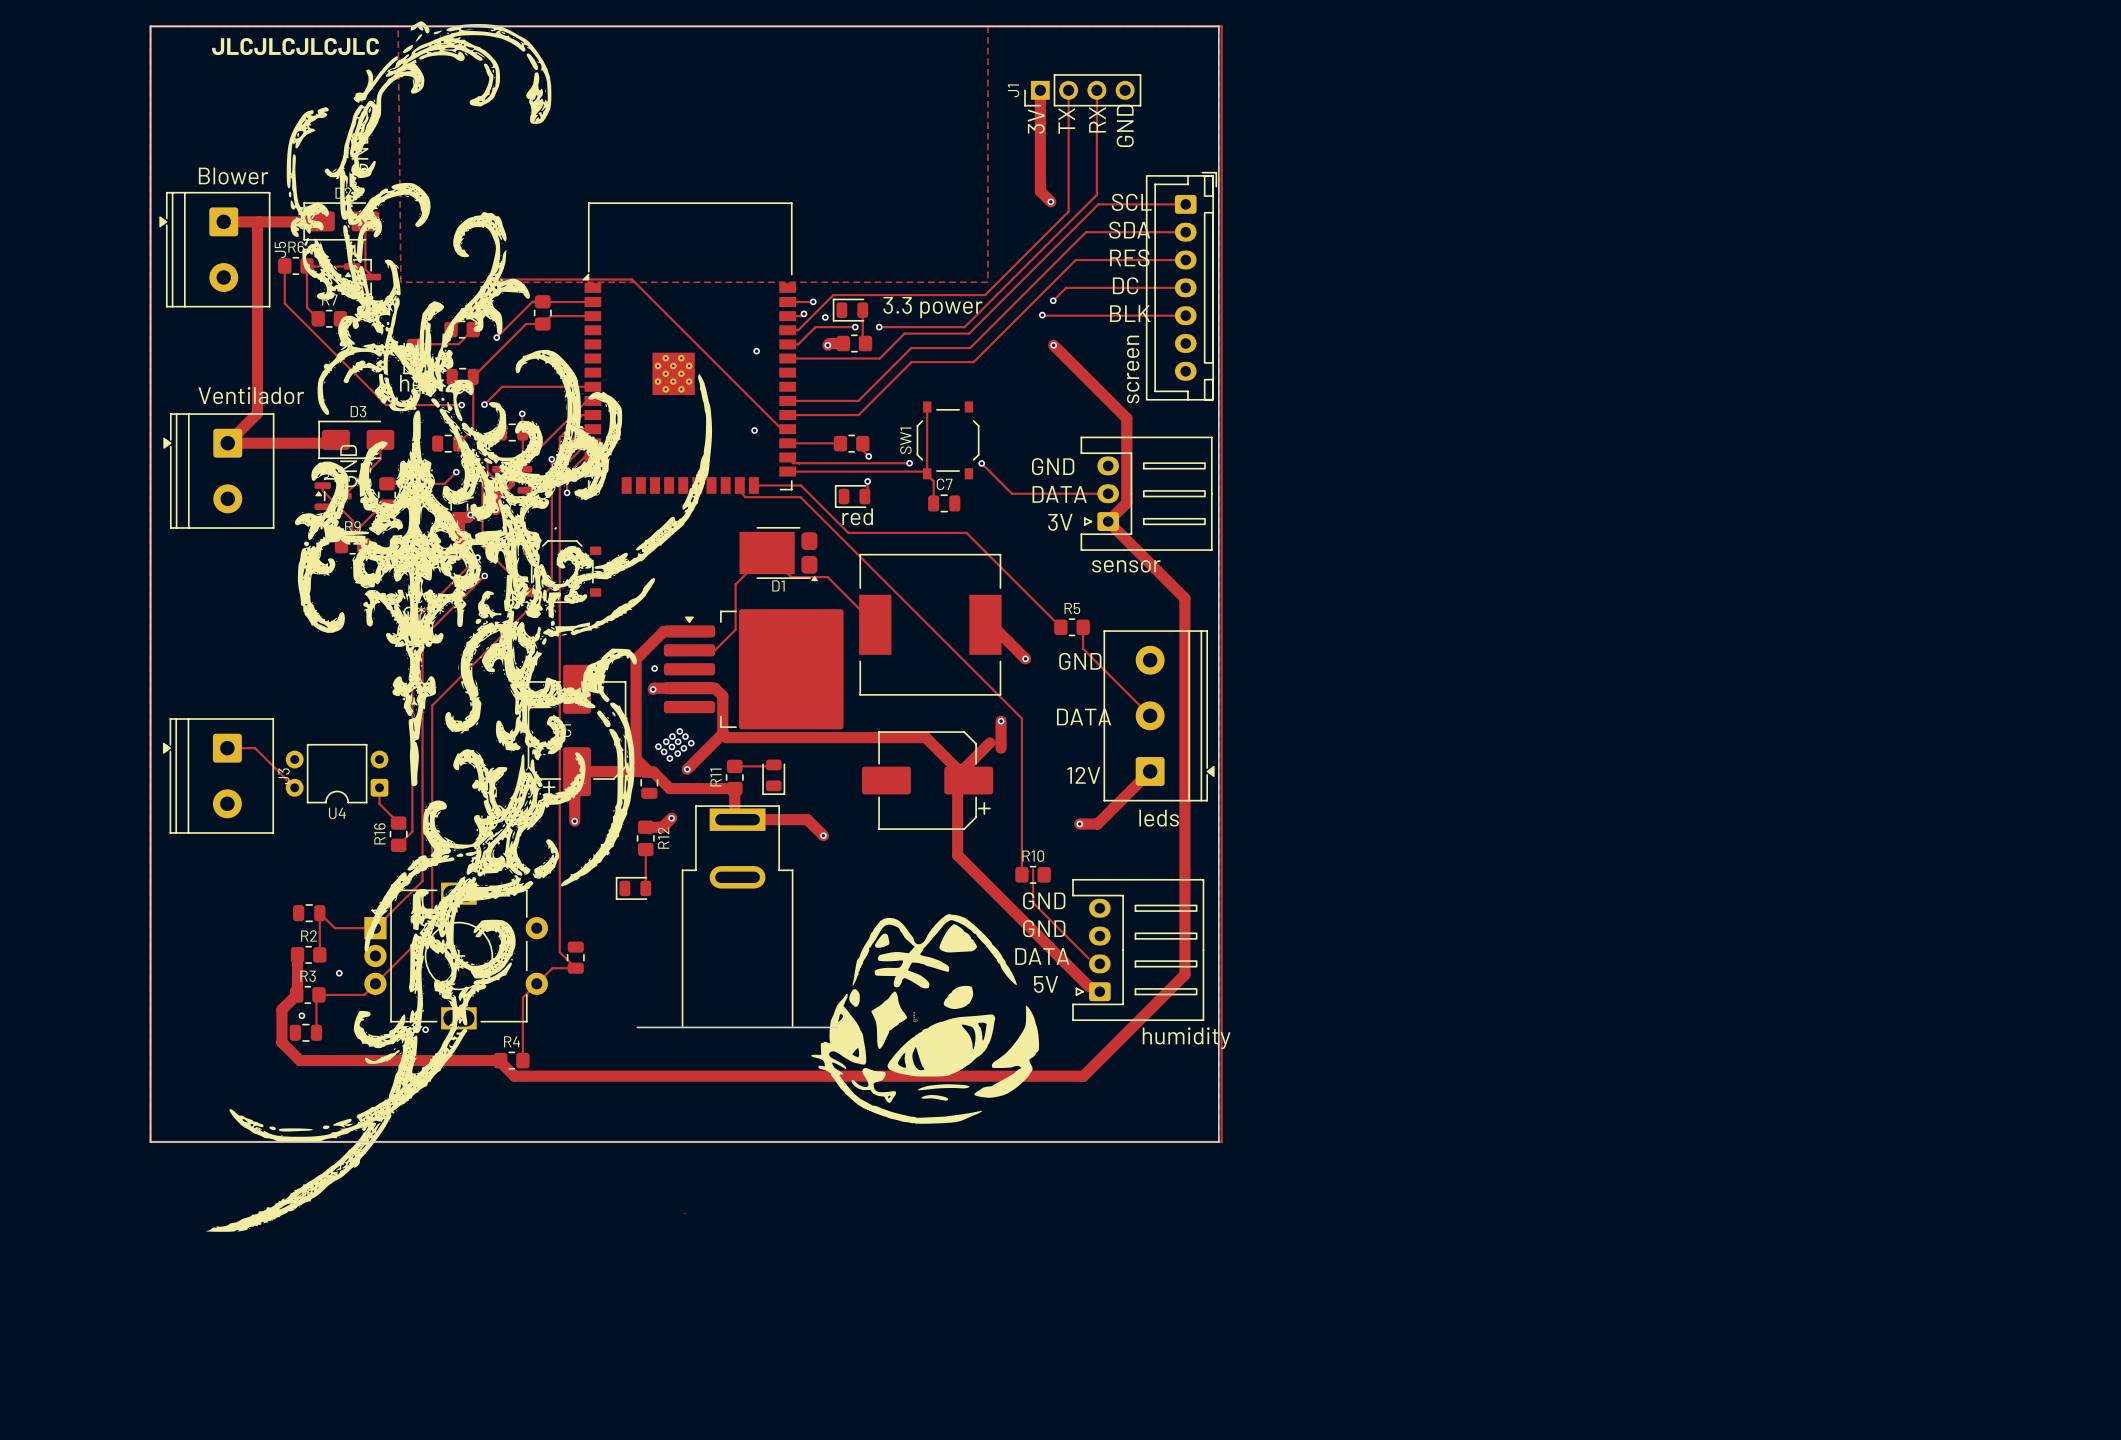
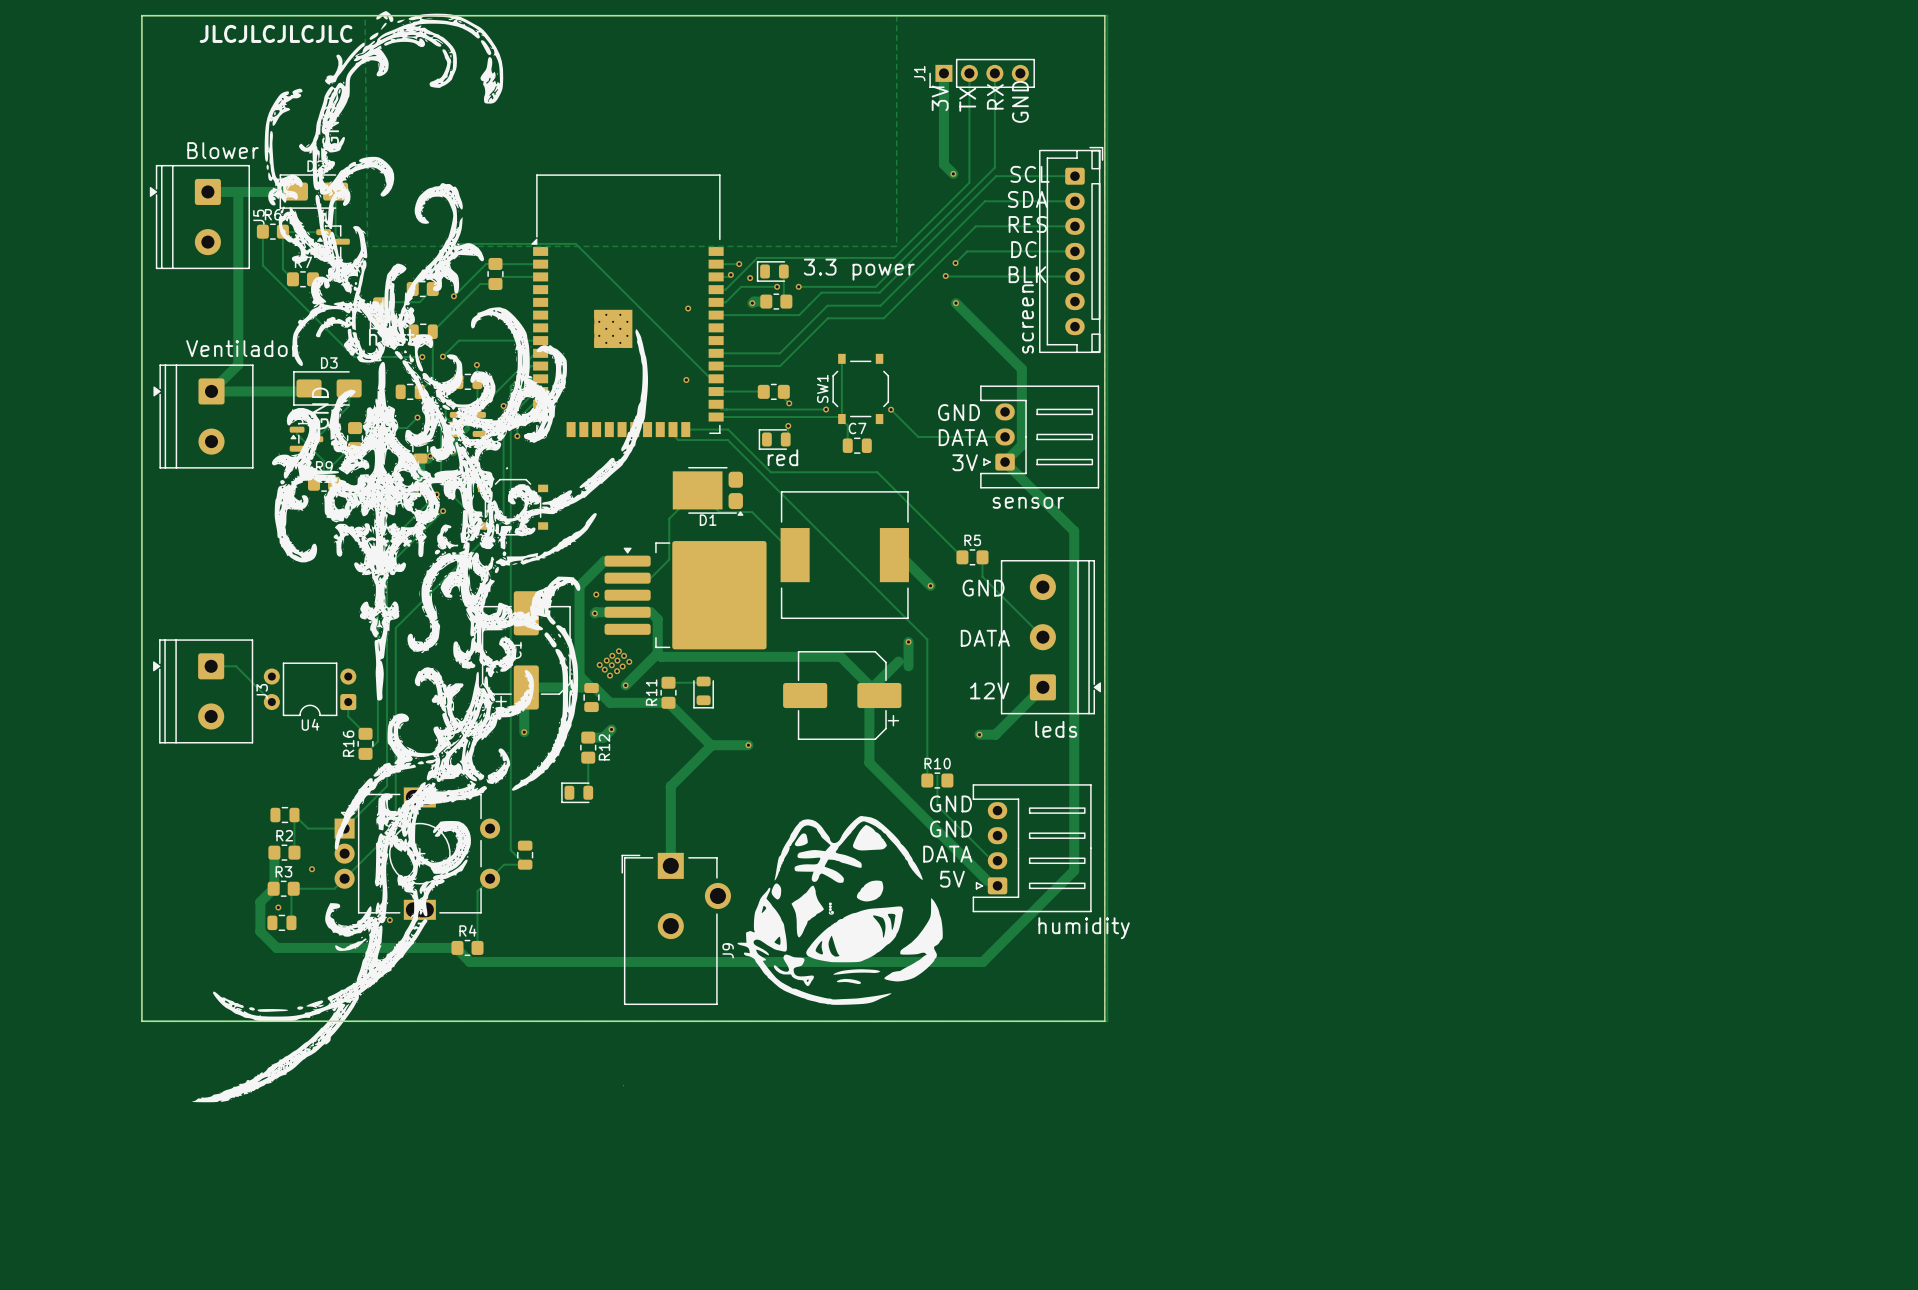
track: (734, 788) (734, 816) (737, 819) (807, 819) (823, 835) -> (668, 702) (710, 745)
track: none -> (710, 745) (748, 745)
track: none -> (710, 745) (670, 786)
track: none -> (670, 786) (670, 865)
part: (737, 916) -> none
J9: none -> (676, 928)

